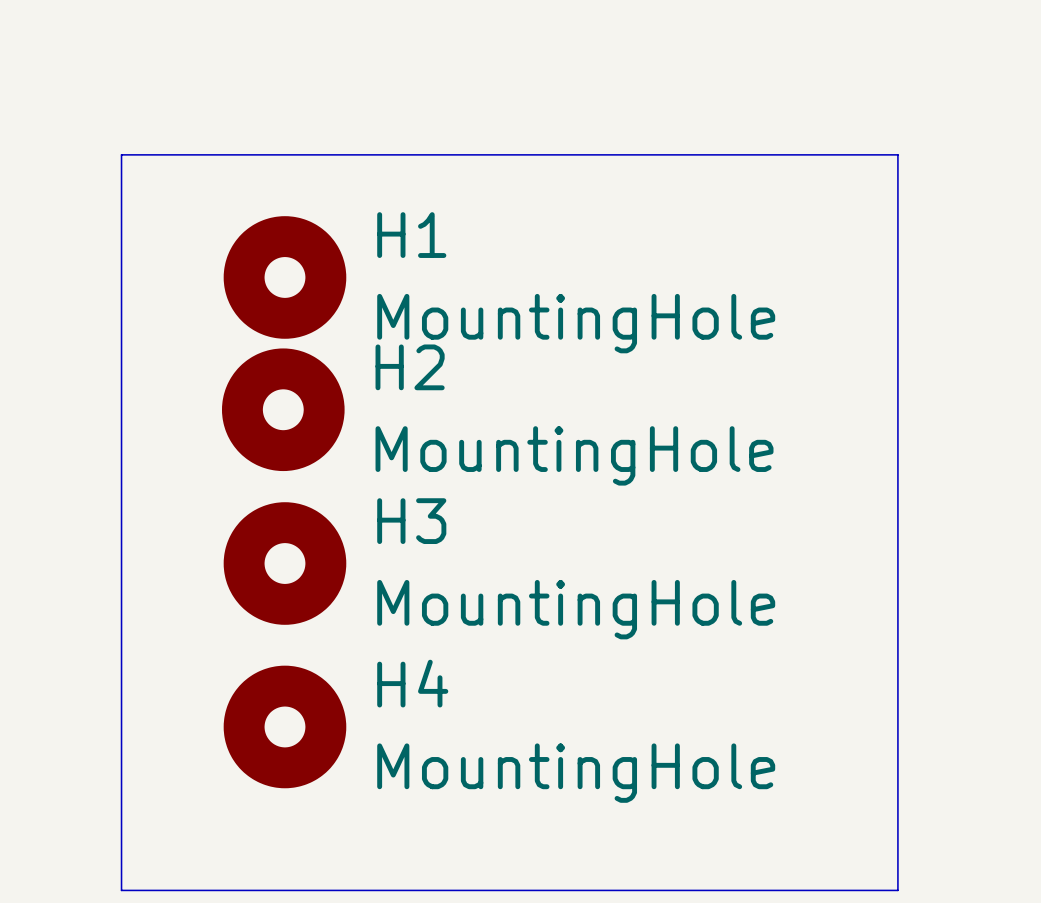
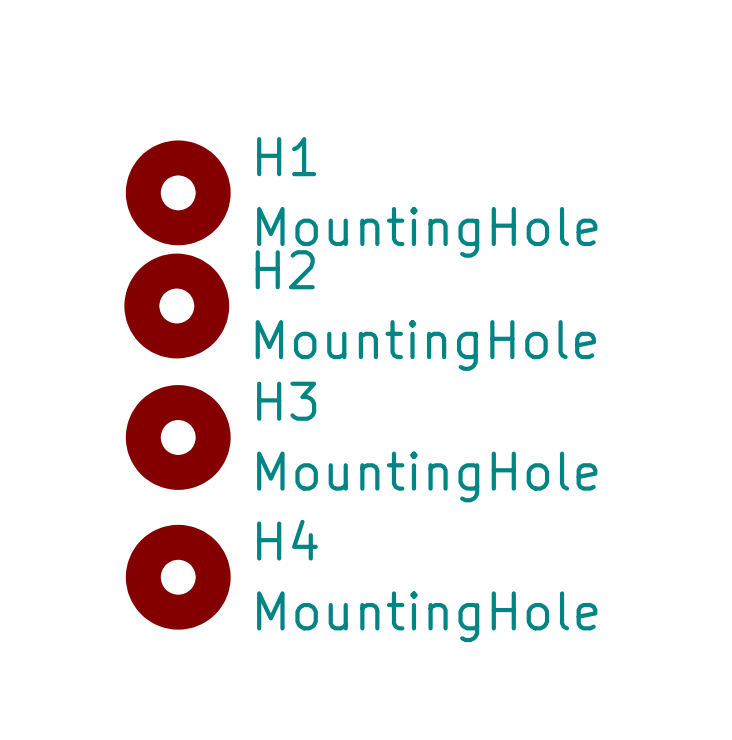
line: (121, 154) (897, 154) (897, 890) (121, 890) (121, 154) -> none

